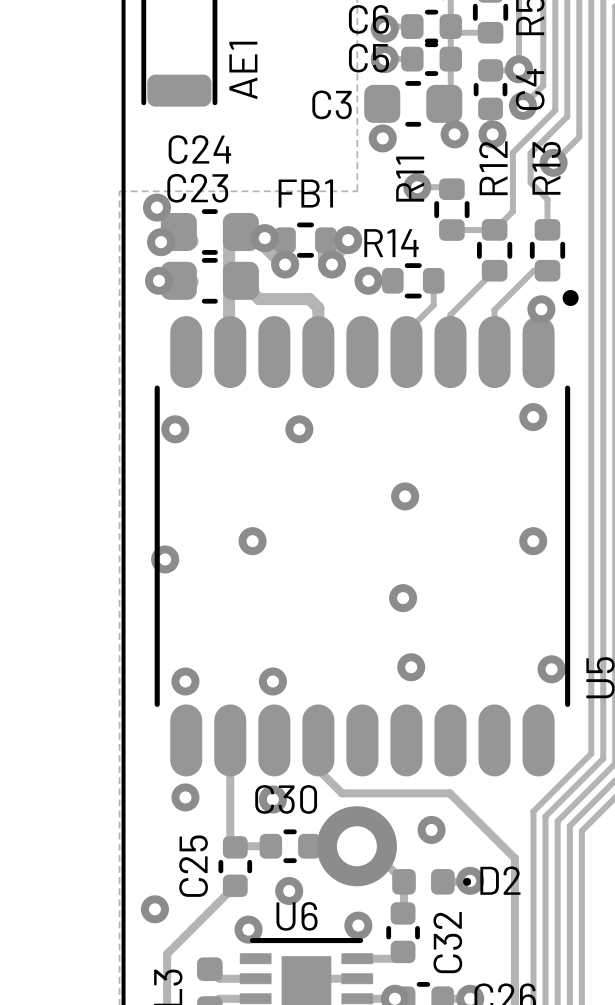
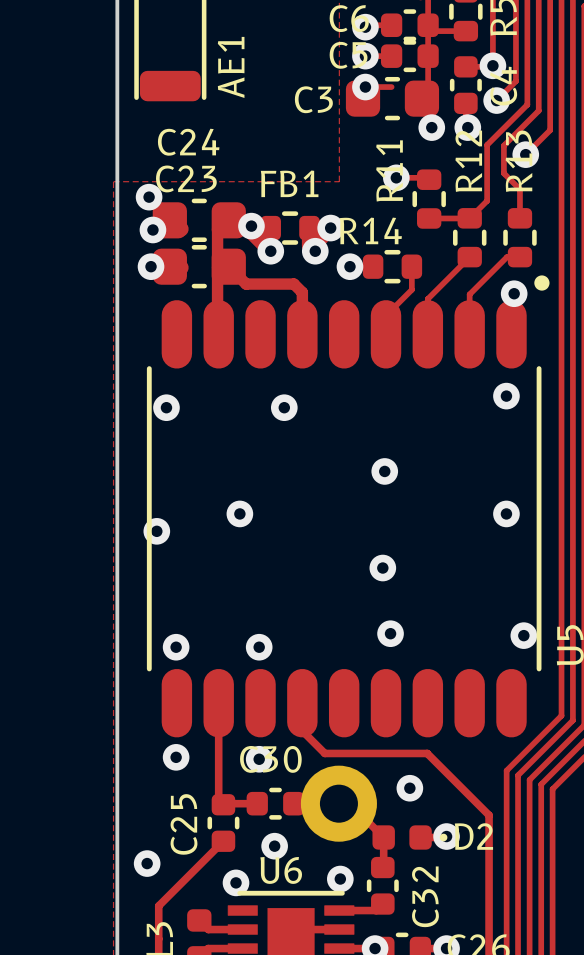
track: none -> (365, 87) (391, 87)
via position: (382, 138) -> (365, 87)

